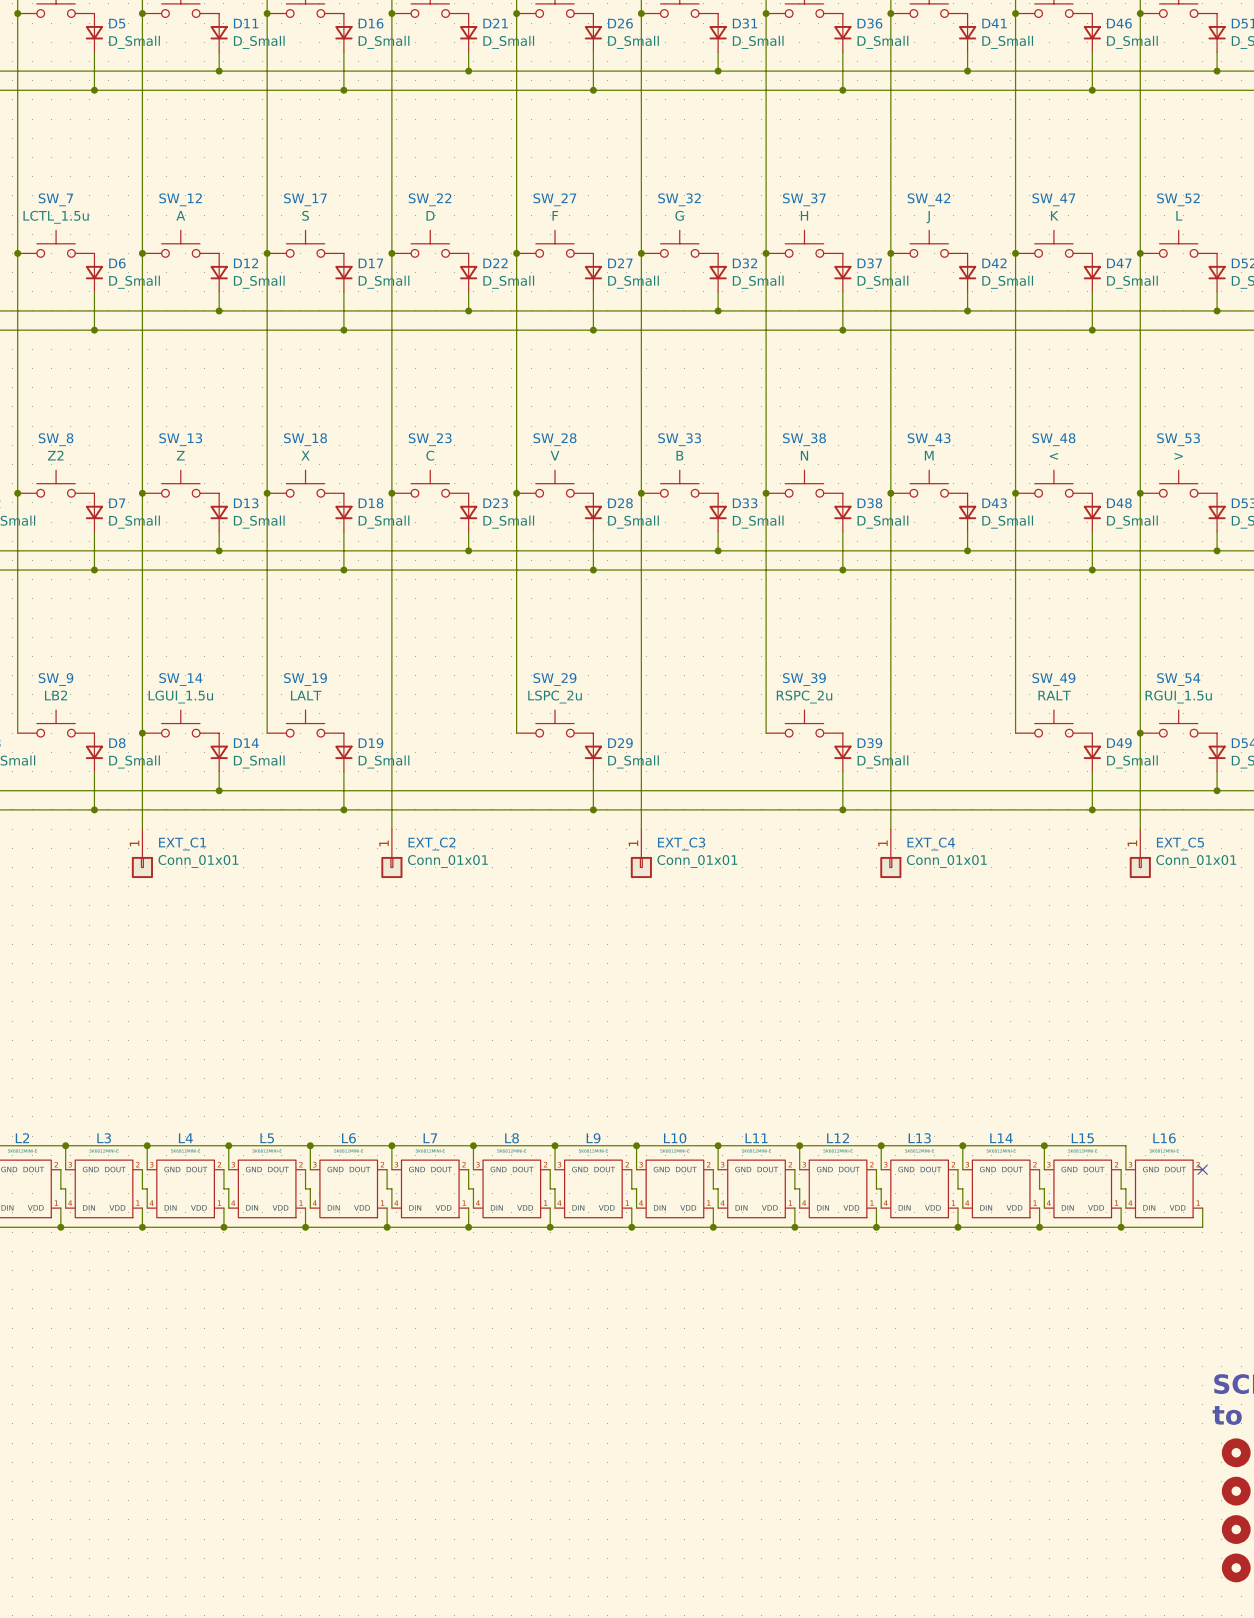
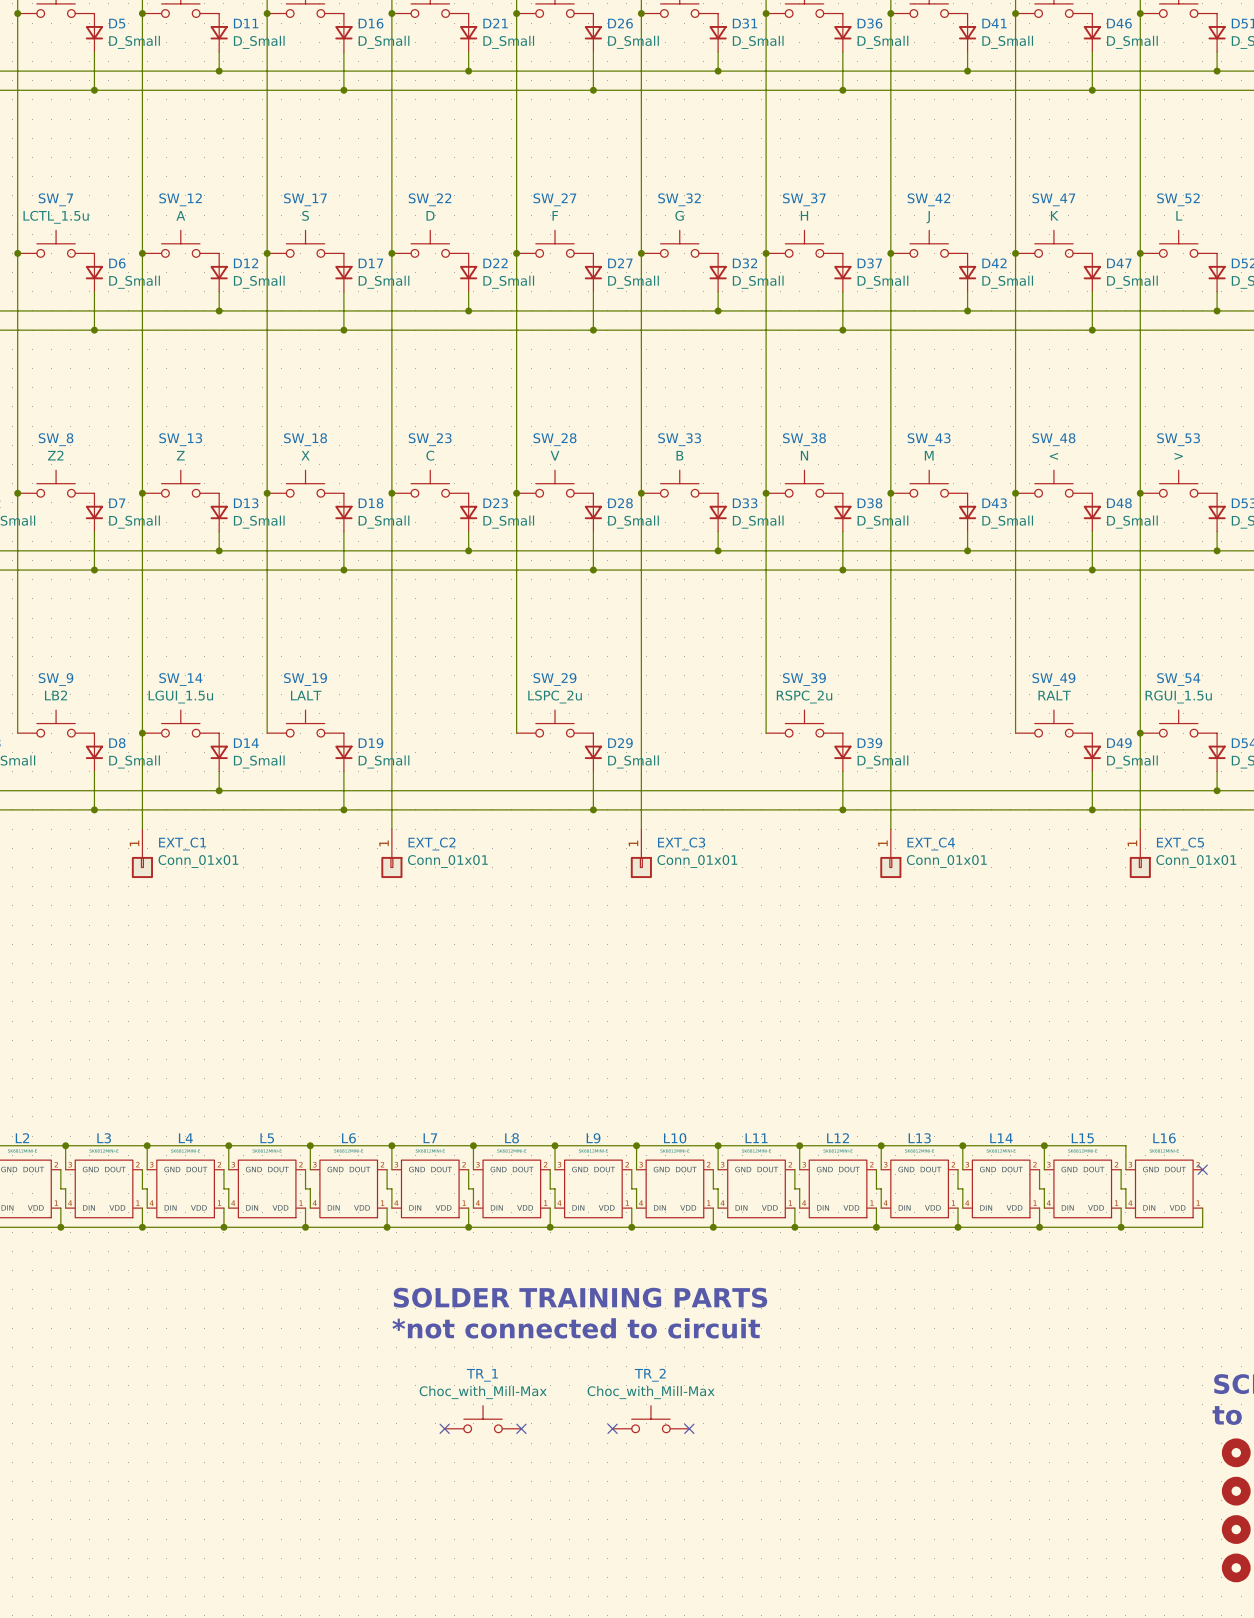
text: none -> SOLDER TRAINING PARTS (580, 1297)
text: none -> *not connected to circuit (576, 1328)
TR_1: none -> Choc_with_Mill-Max (483, 1419)
TR_2: none -> Choc_with_Mill-Max (650, 1419)
no-connect mark: none -> (444, 1428)
no-connect mark: none -> (521, 1428)
no-connect mark: none -> (612, 1428)
no-connect mark: none -> (689, 1428)

